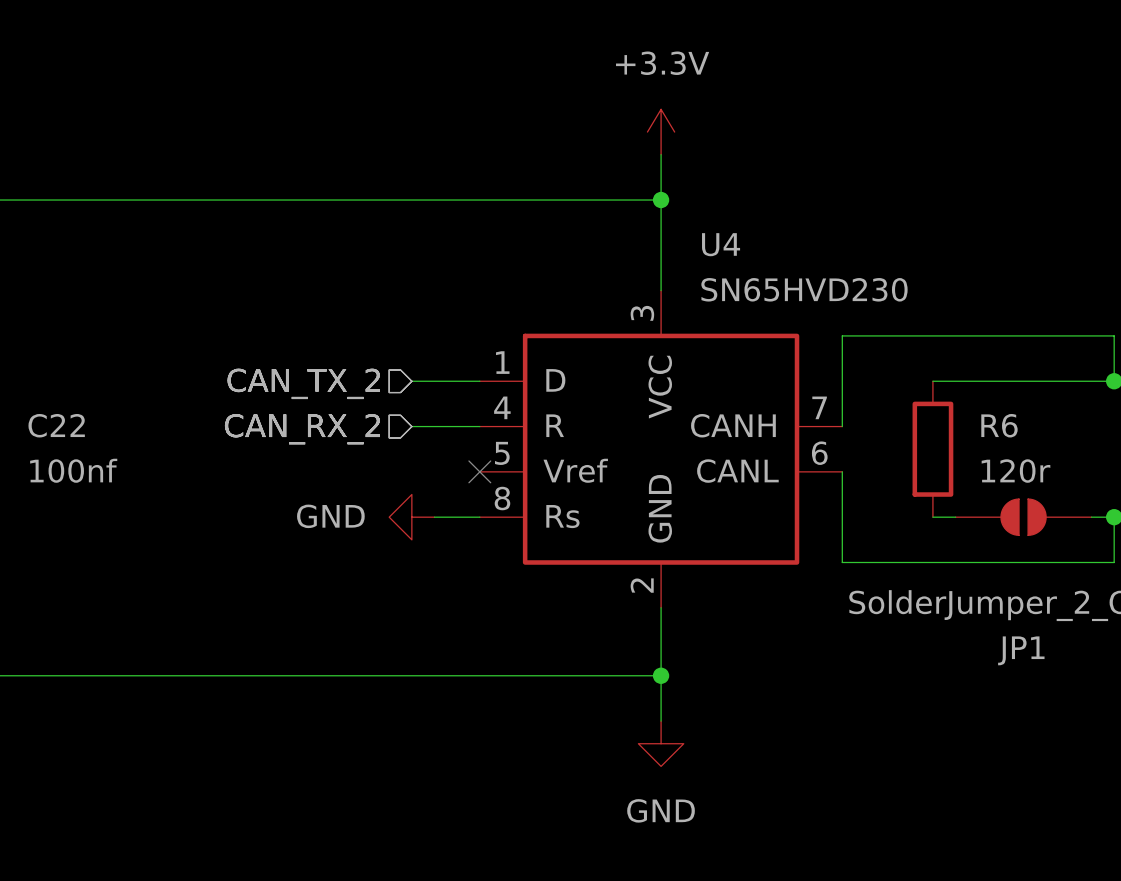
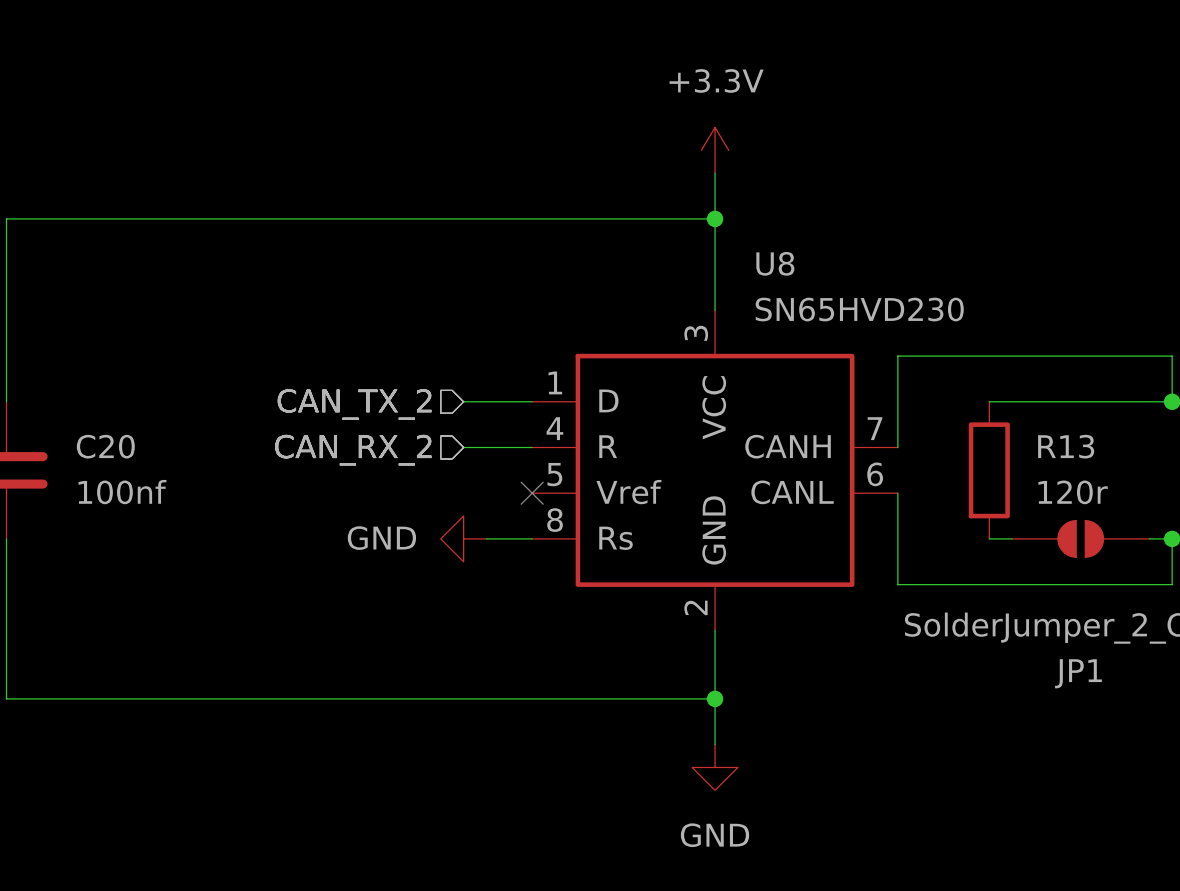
U4 name: U4 (721, 244) -> U8 (775, 263)
C22 name: C22 (56, 425) -> C20 (105, 446)
R6 name: R6 (999, 425) -> R13 (1066, 446)

